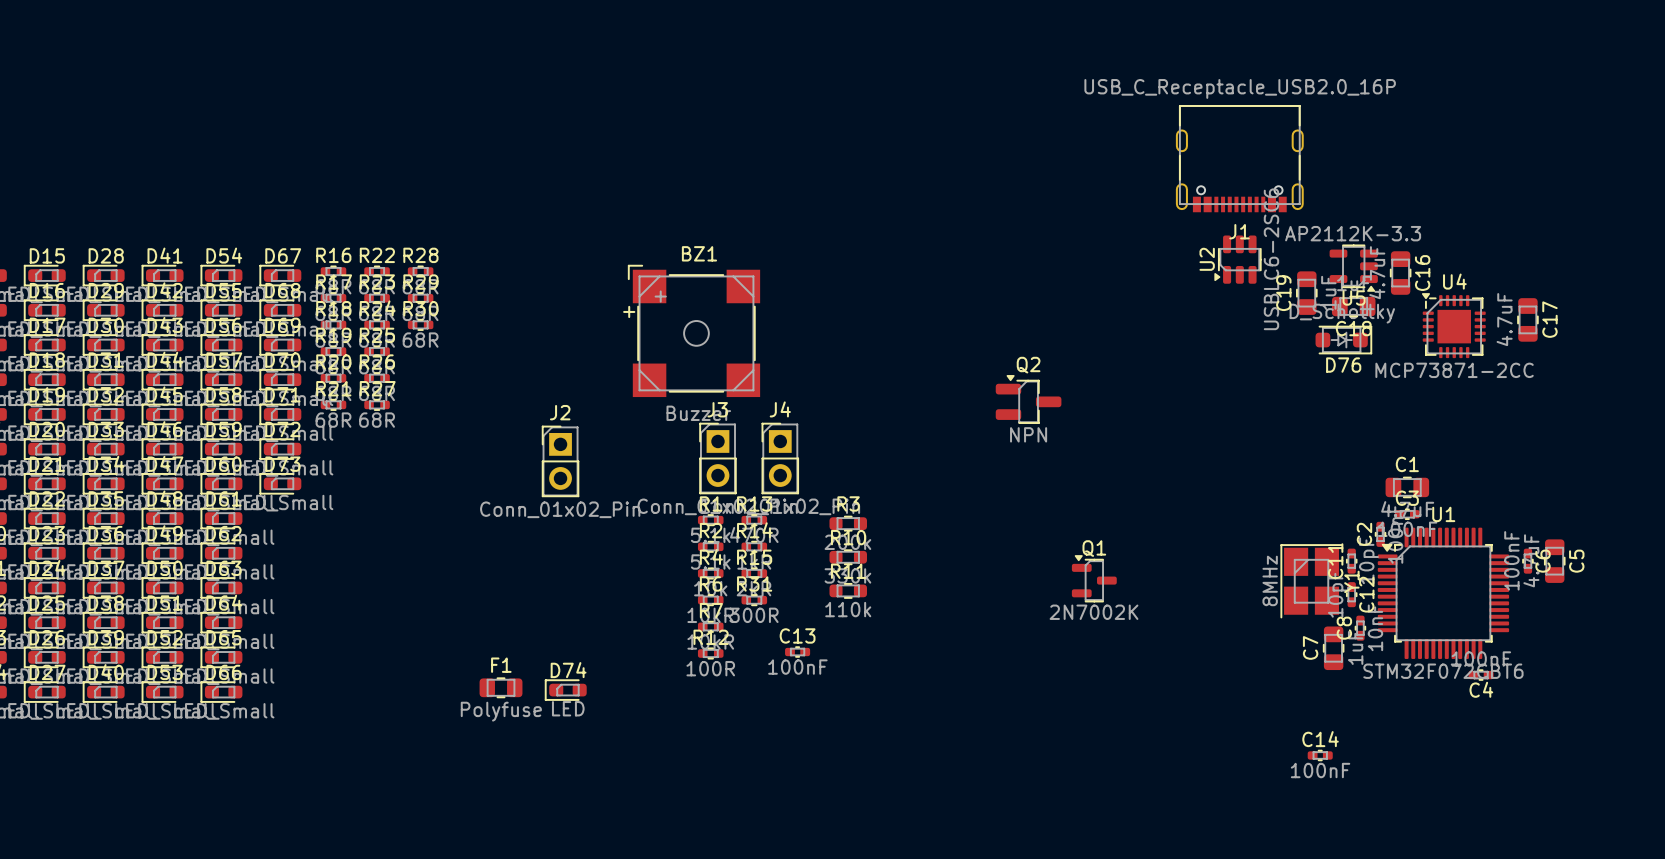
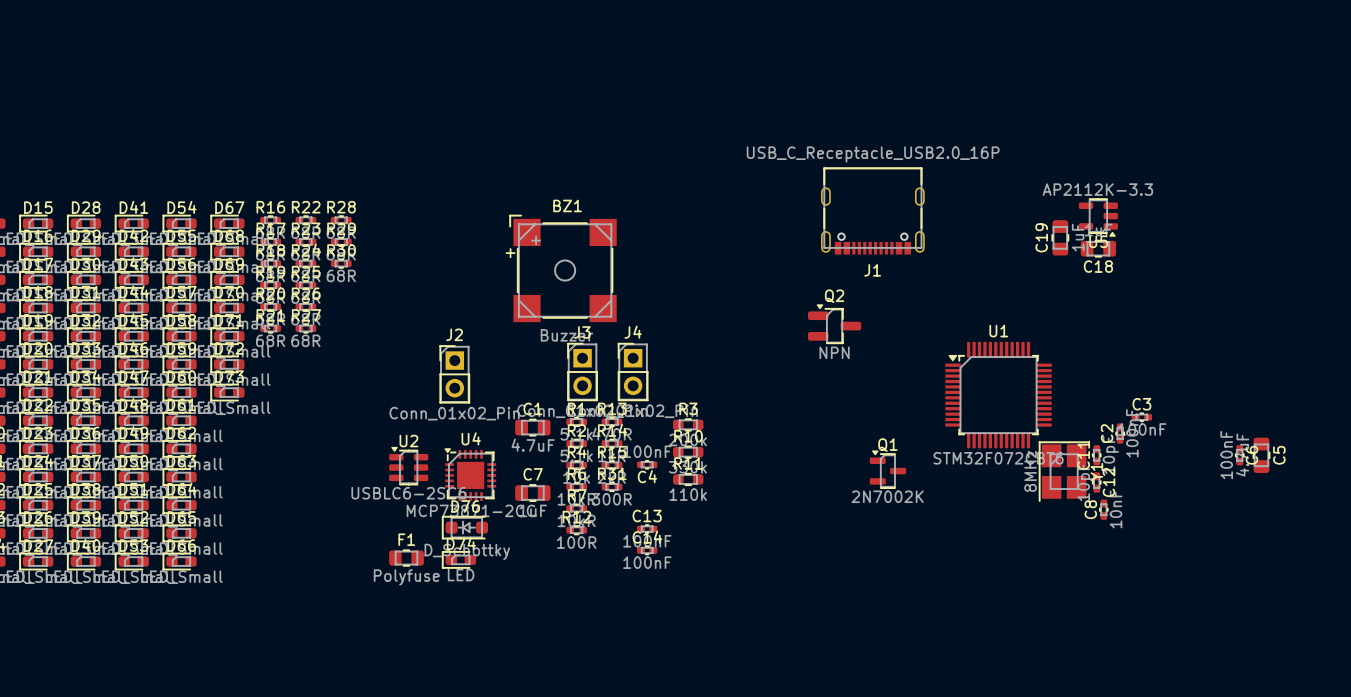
J1 position: (1239, 158) -> (872, 211)
U2 rotation: 0° (1237, 259) -> 90° clockwise (408, 466)
U2 position: (1237, 259) -> (408, 466)
C16: 4.7uF (1400, 273) -> none
C17: 4.7uF (1527, 319) -> none
U4 position: (1453, 325) -> (470, 474)
D76 rotation: 0° (1343, 340) -> 180° (465, 527)
D76 position: (1343, 340) -> (465, 527)
C1 position: (1407, 487) -> (532, 427)
U1 position: (1443, 593) -> (998, 395)
C7 rotation: 0° (1333, 648) -> 90° clockwise (532, 493)
C7 position: (1333, 648) -> (532, 493)
C4 position: (1481, 675) -> (647, 464)
C14 position: (1320, 755) -> (647, 550)

